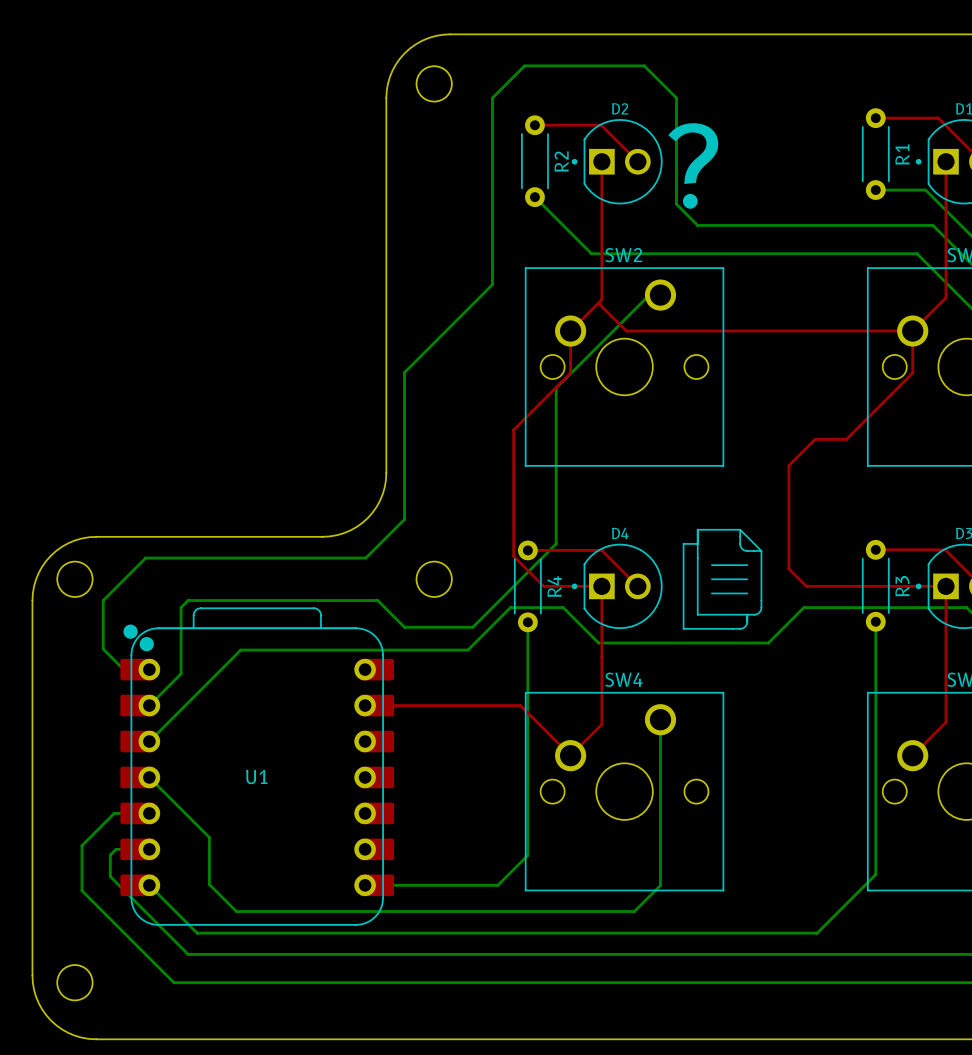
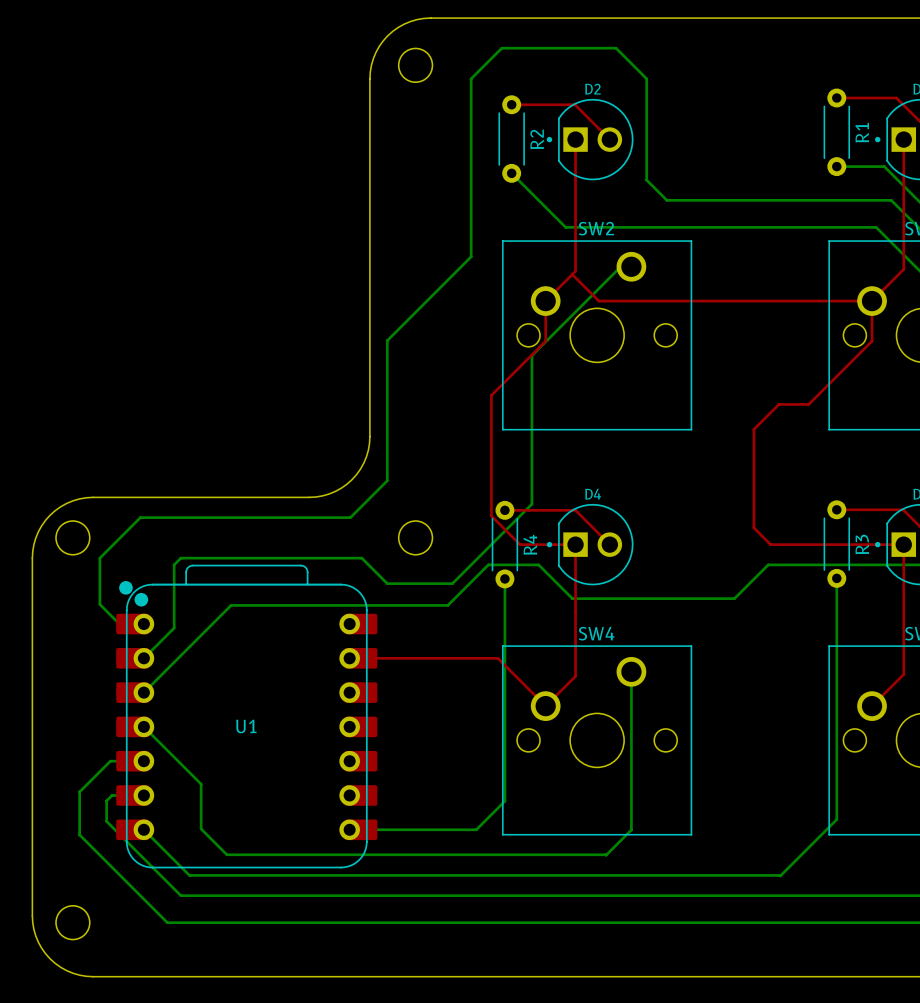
text: ? (693, 165) -> none
line: (740, 529) (697, 529) (697, 614) (754, 614) (759, 612) (761, 607) (761, 550) -> none
line: (740, 529) (740, 544) (742, 548) (746, 550) (761, 550) -> none
line: (740, 529) (761, 550) -> none
line: (697, 543) (683, 543) (683, 628) (742, 628) (746, 624) (747, 614) -> none
line: (711, 565) (747, 565) -> none
line: (711, 579) (747, 579) -> none
line: (711, 593) (747, 593) -> none

